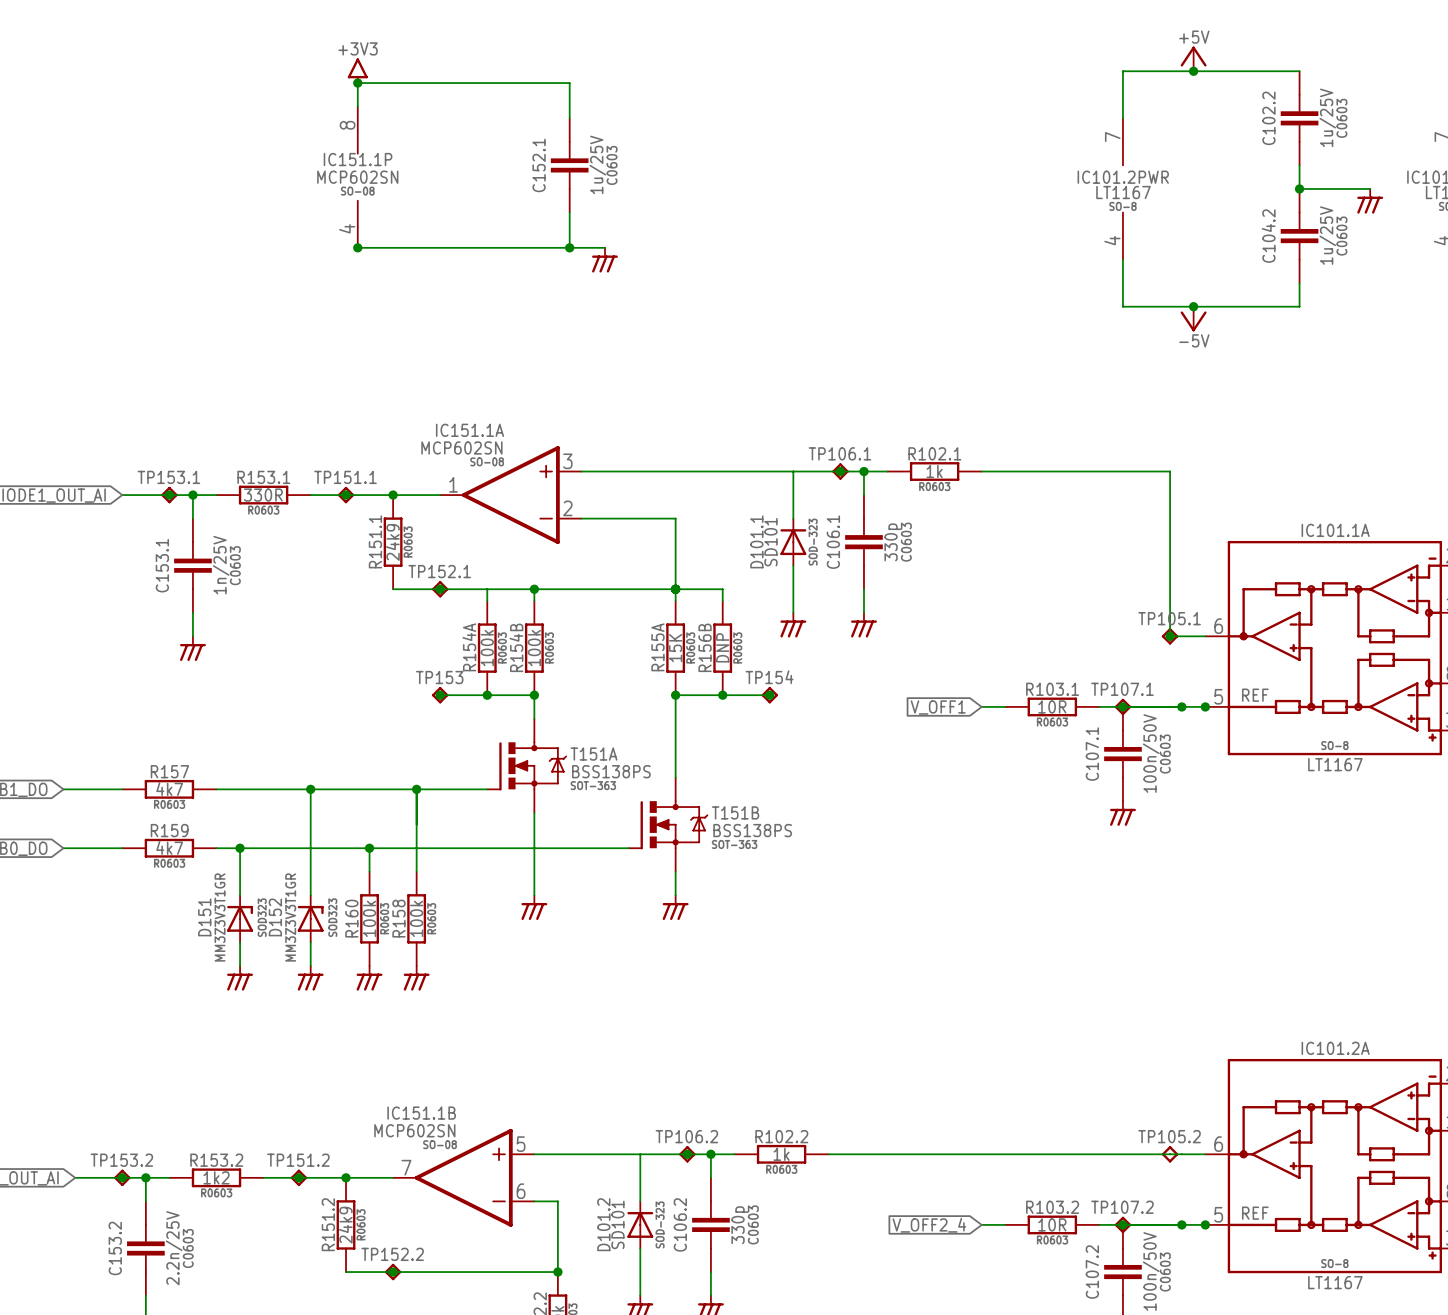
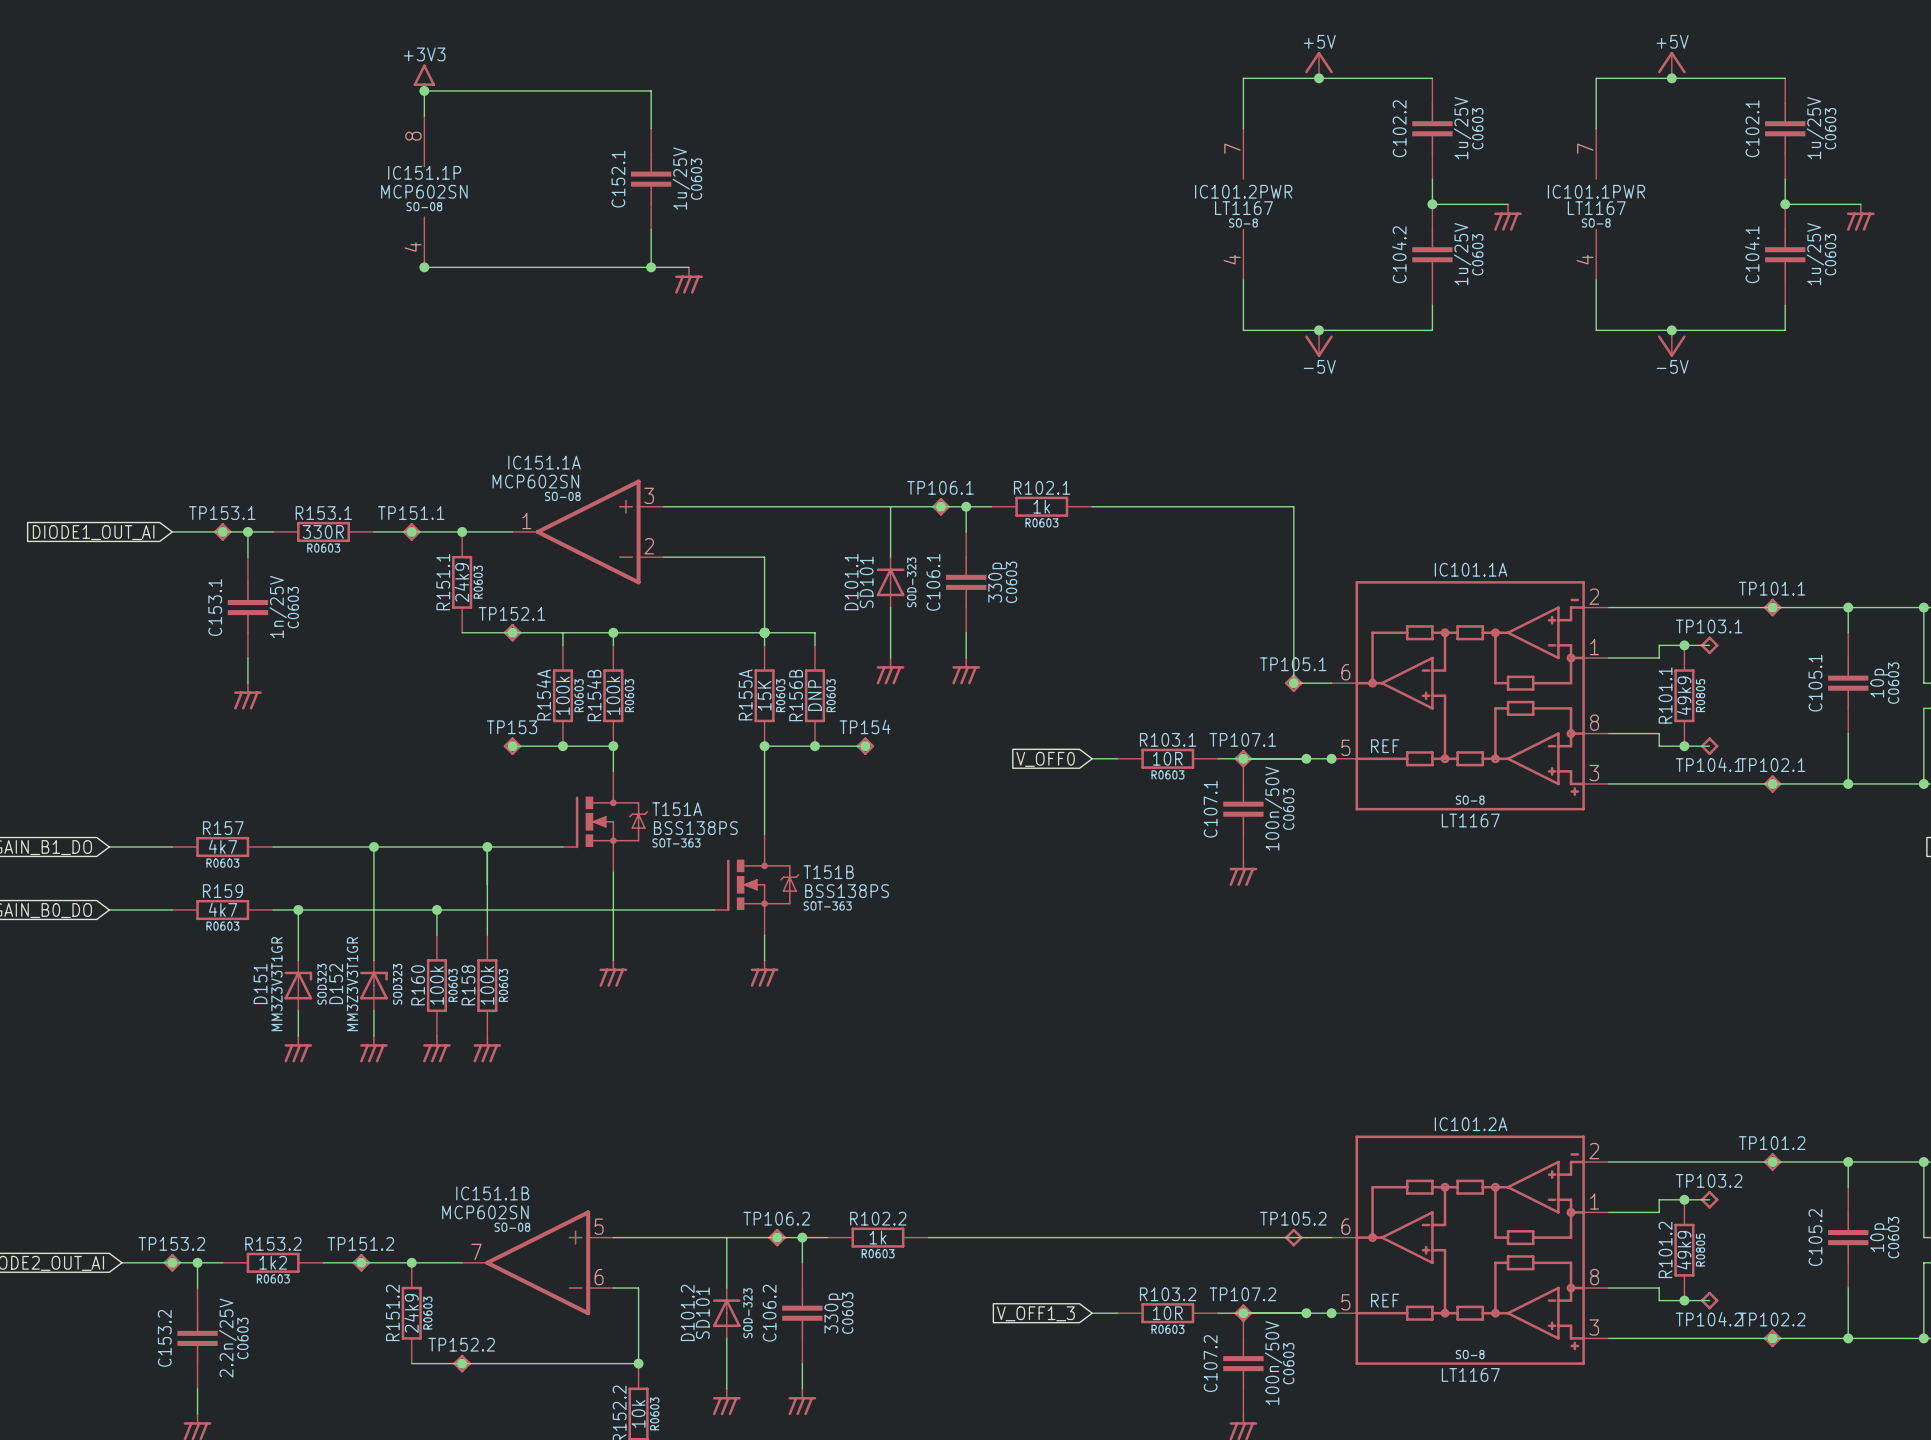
global label: V_OFF1 (938, 707) -> V_OFF0 (1045, 759)
global label: V_OFF2_4 (929, 1225) -> V_OFF1_3 (1035, 1313)

